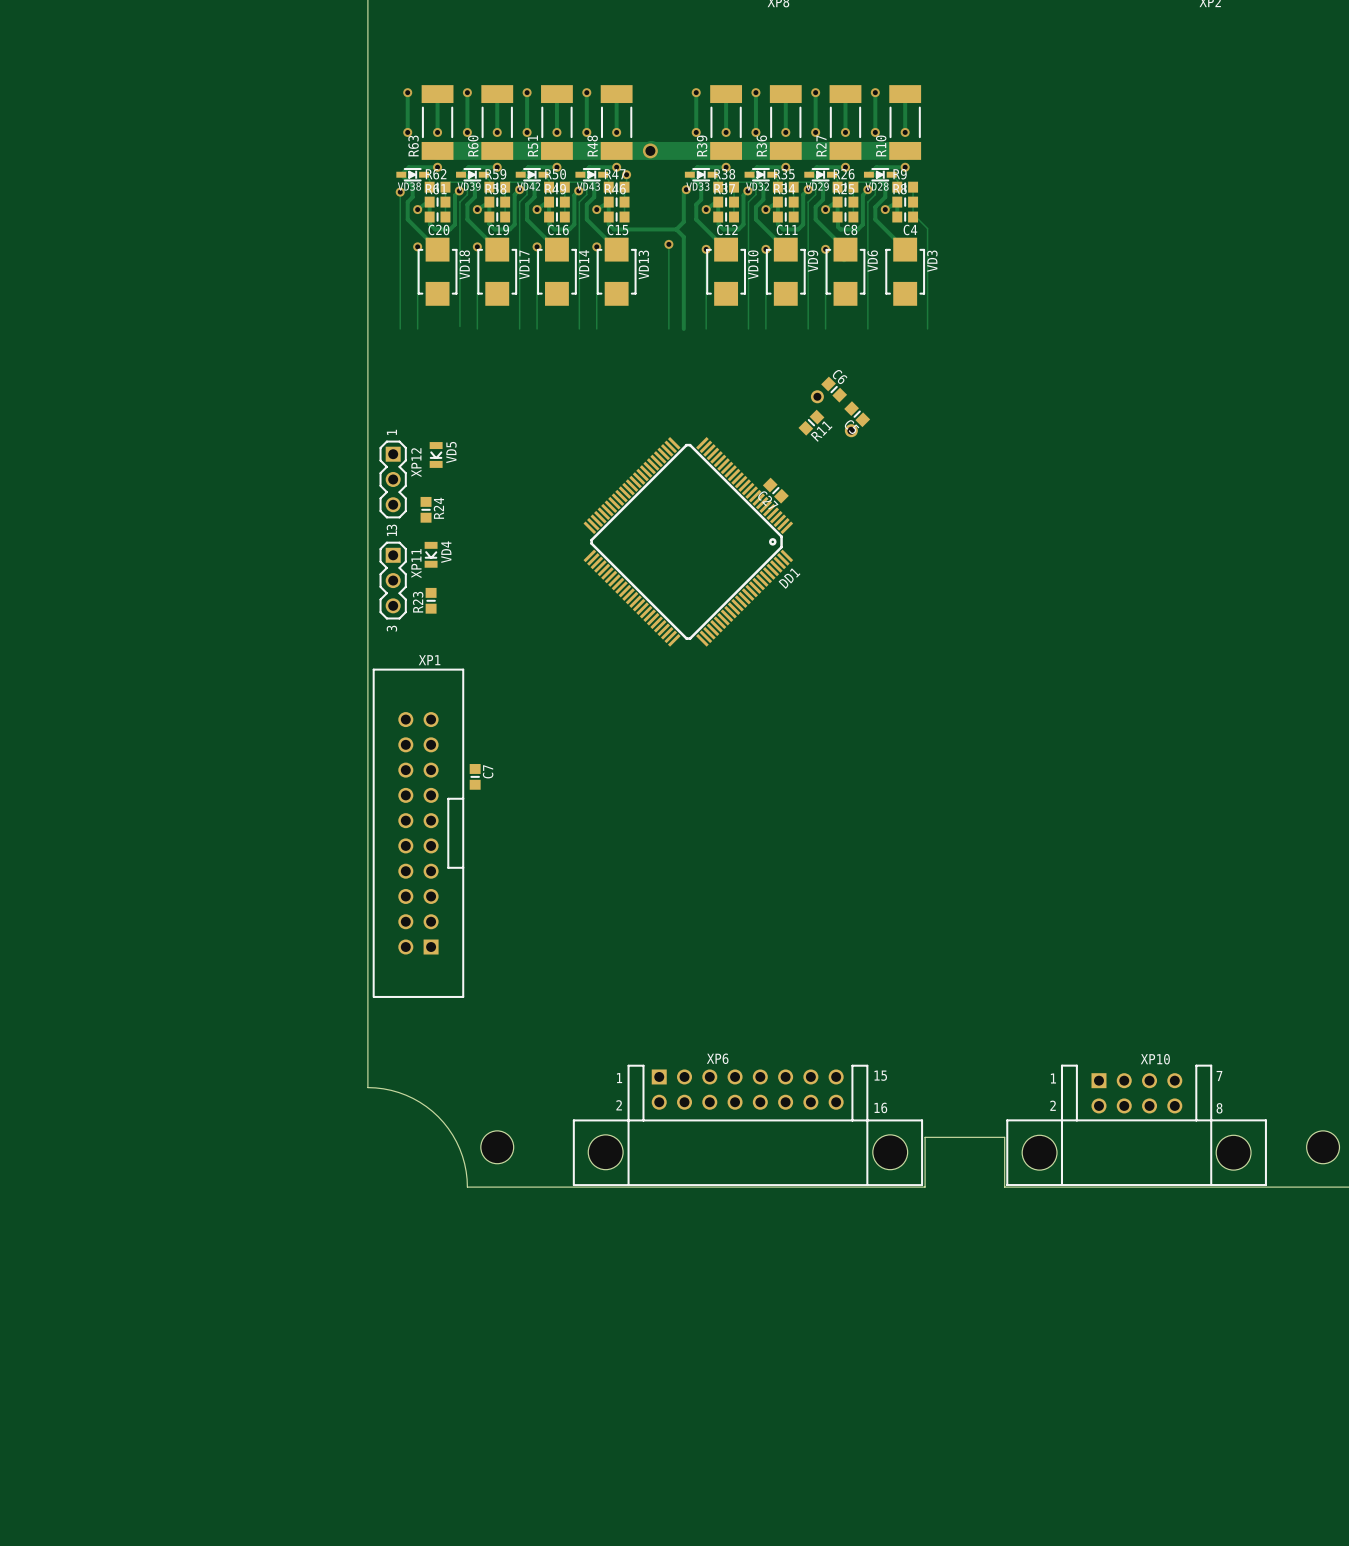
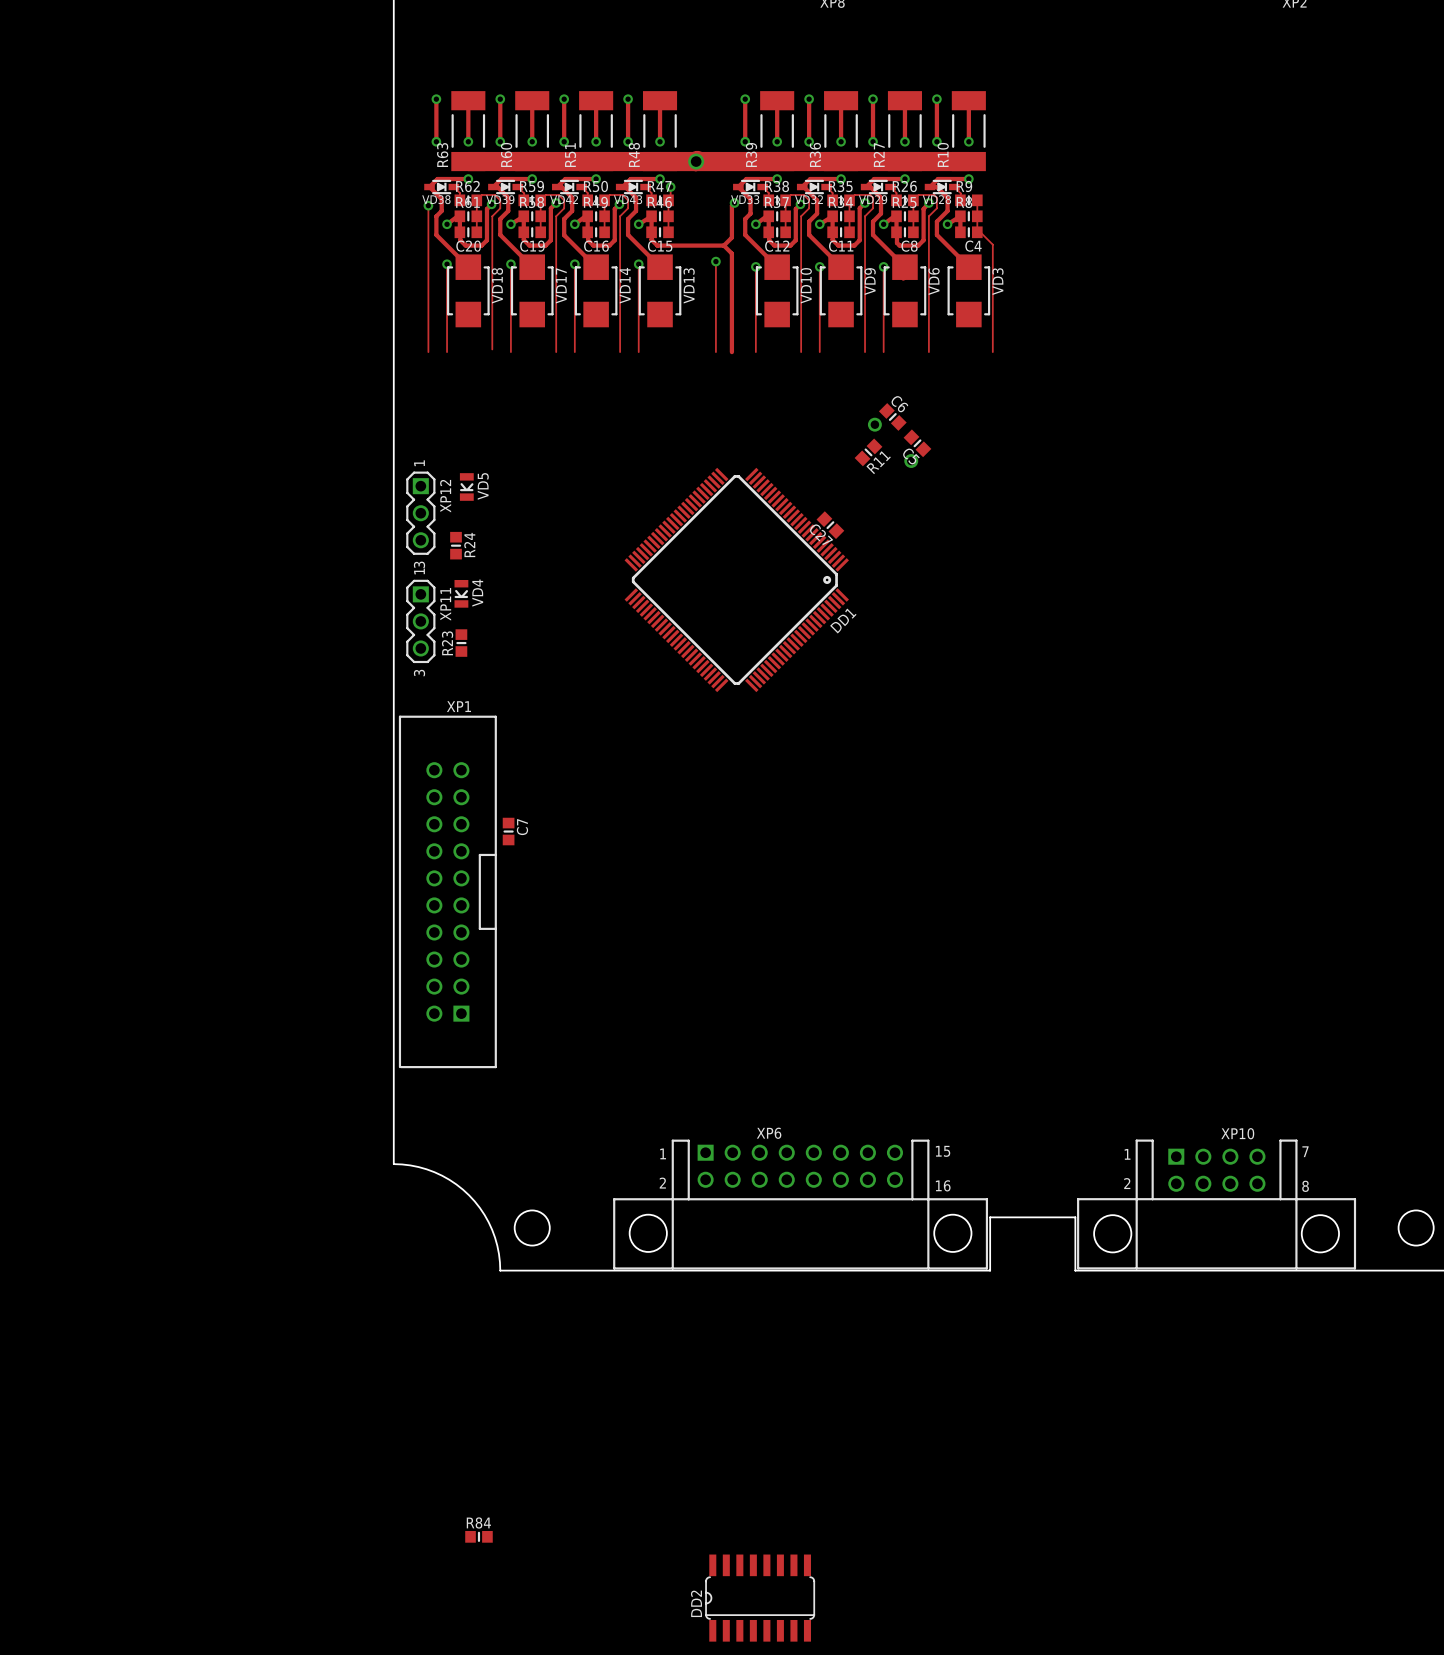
R84: none -> (478, 1536)
DD2: none -> (760, 1598)

